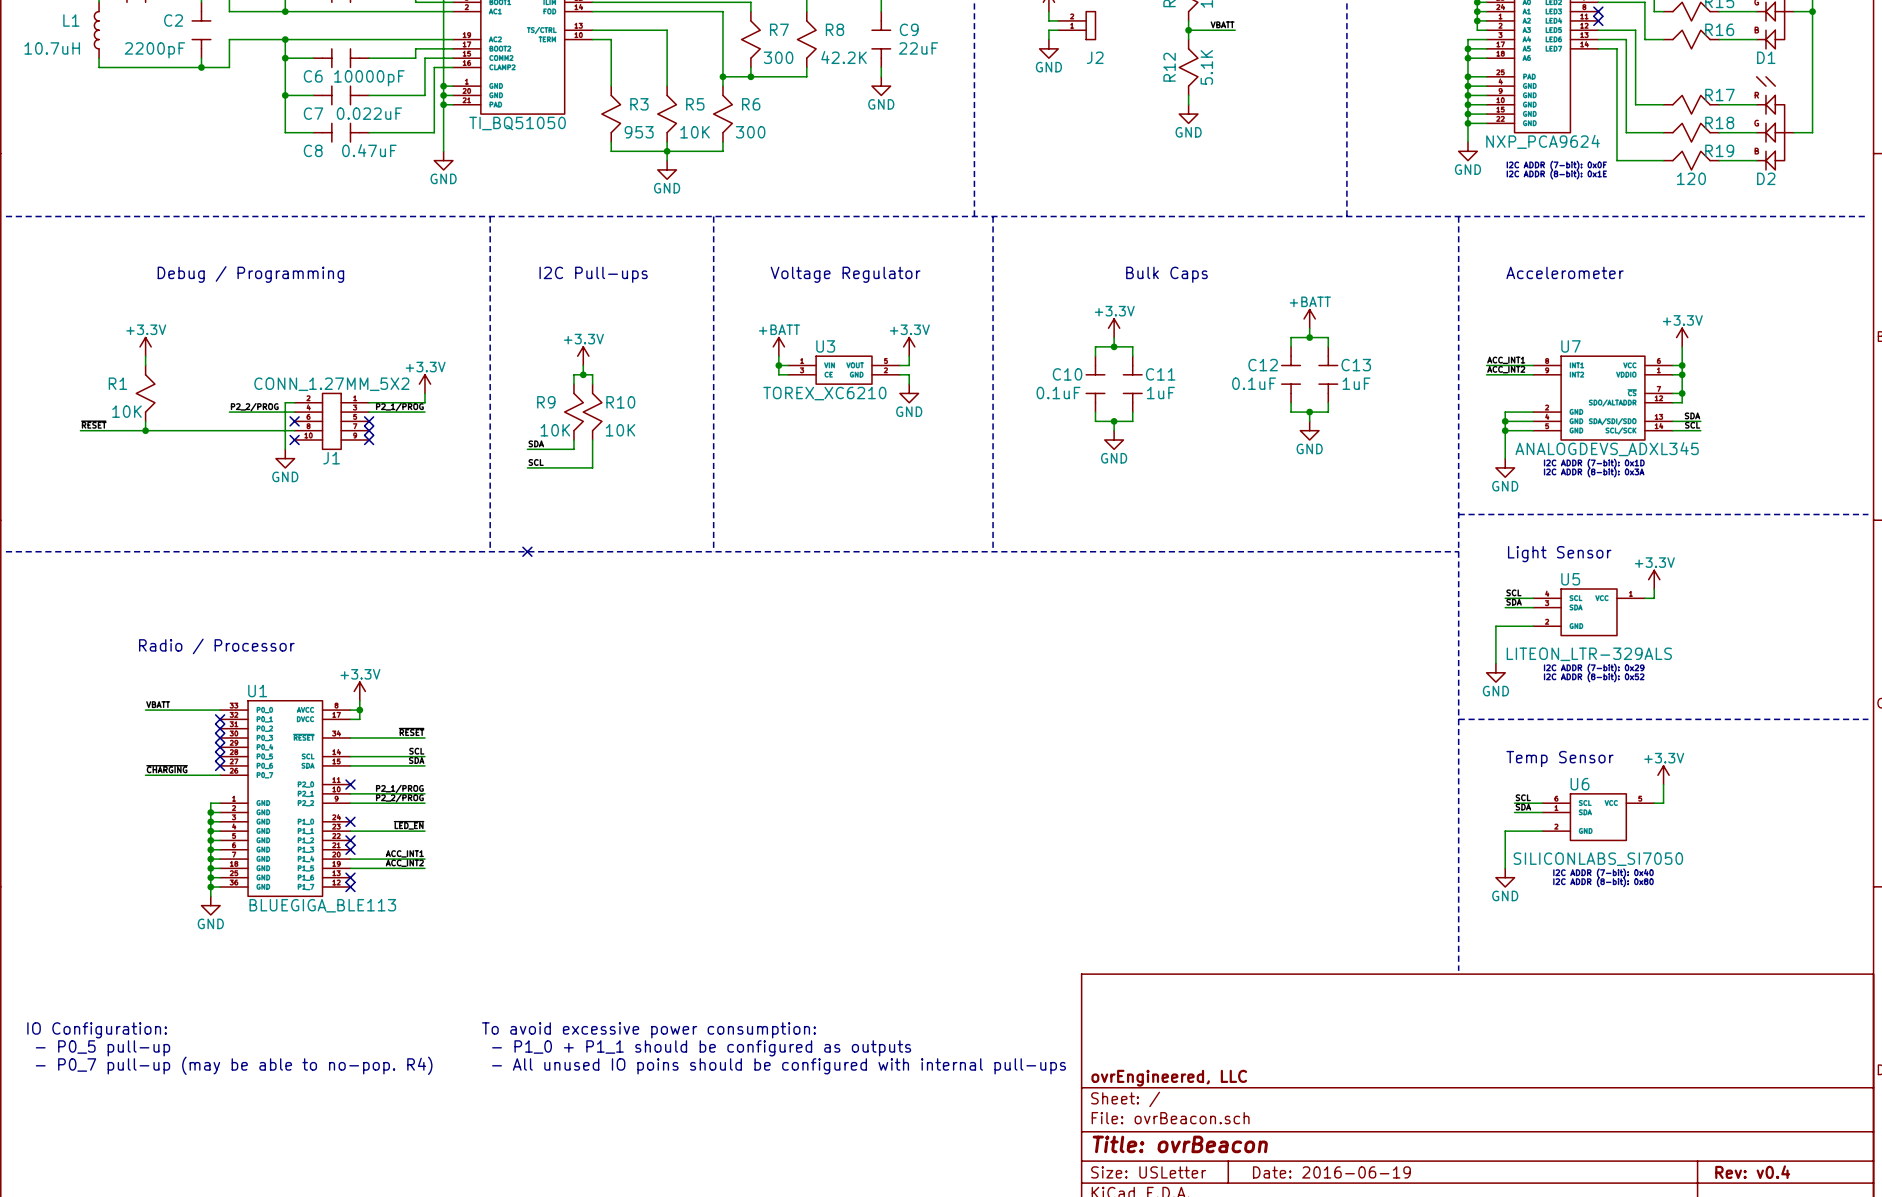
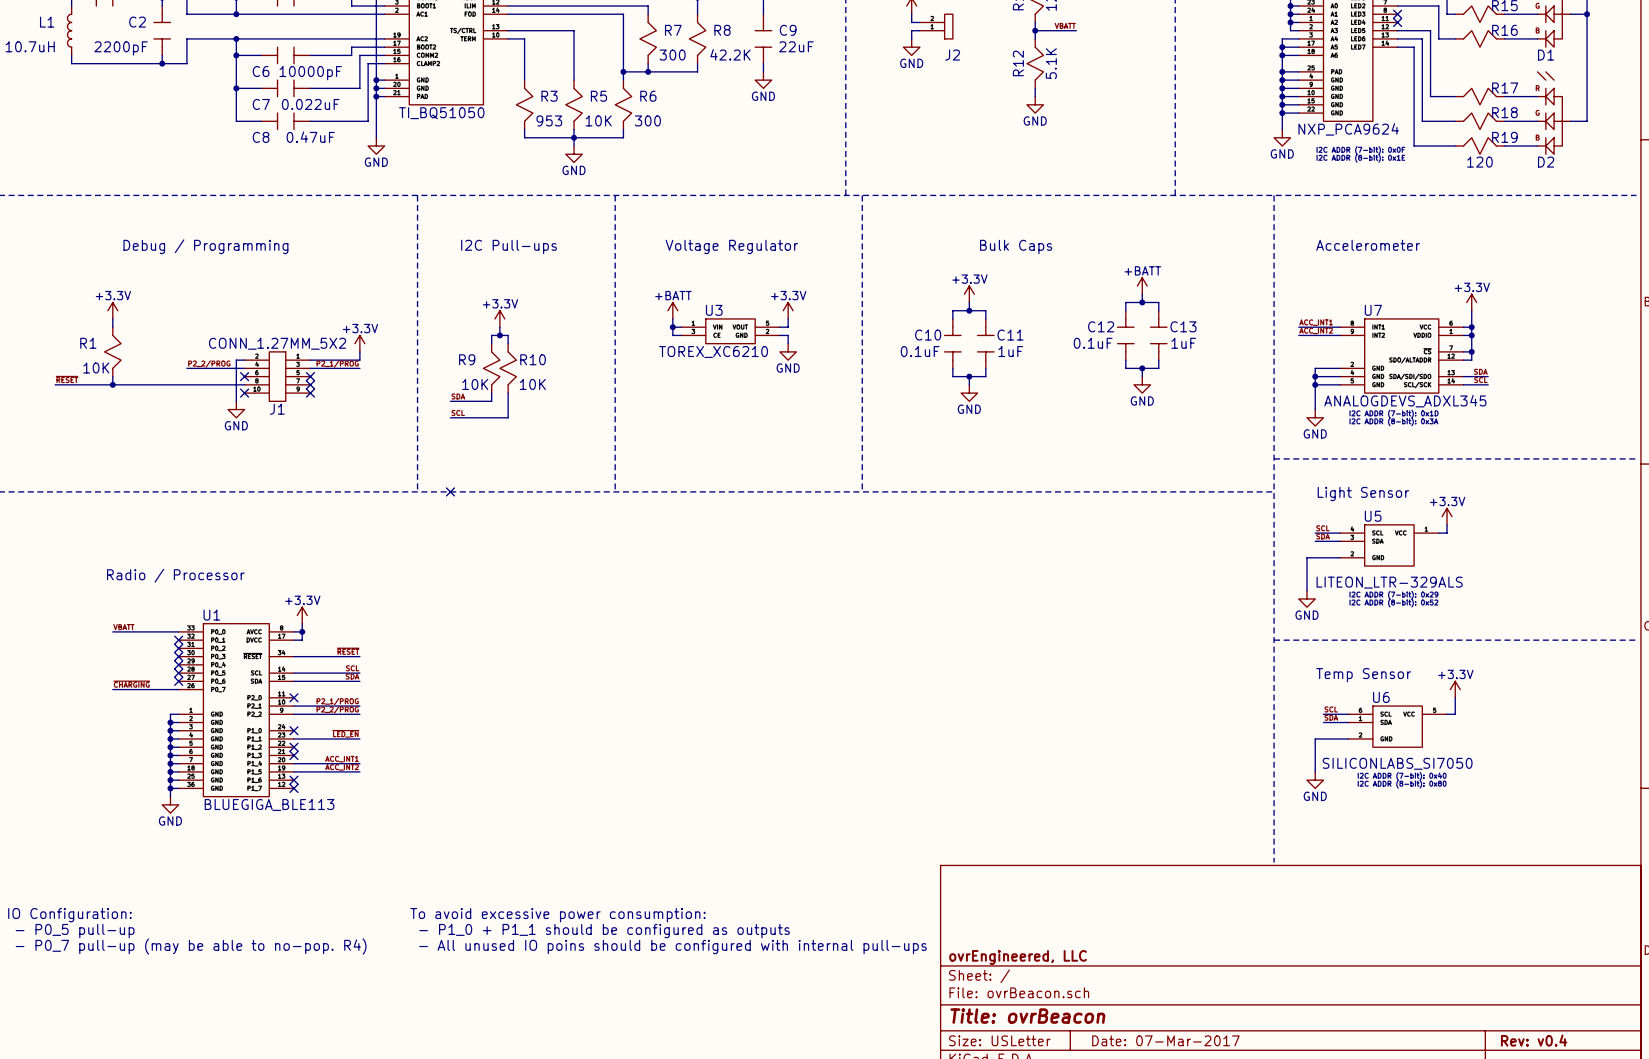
title block: Date: 2016-06-19 (1331, 1172) -> Date: 07-Mar-2017 (1165, 1040)

